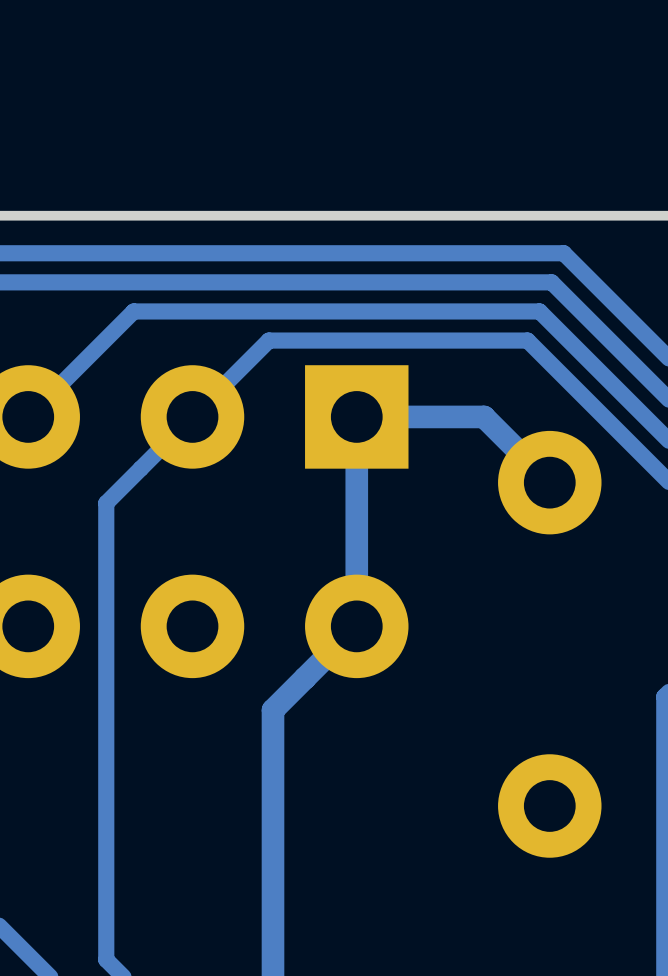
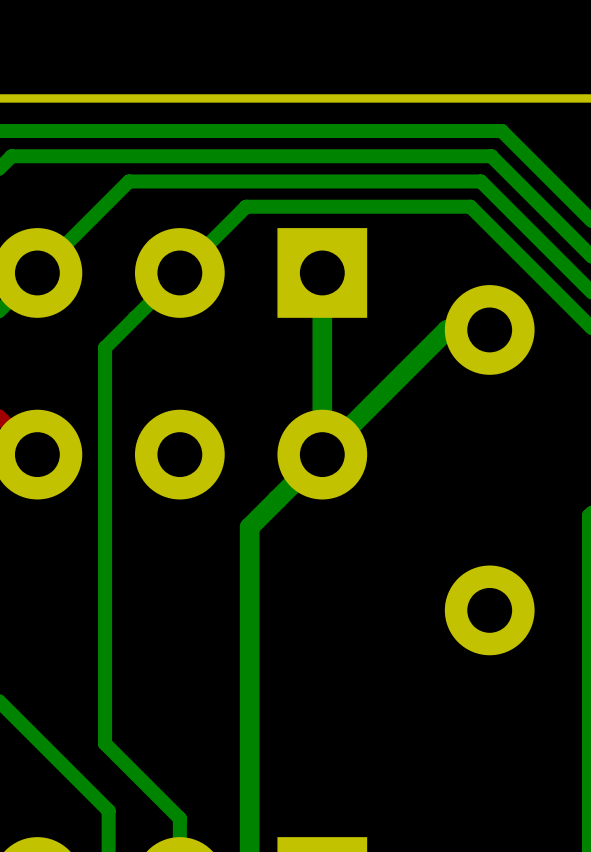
bottom track: (356, 416) (484, 416) (549, 482) -> (322, 454) (446, 329) (489, 329)

